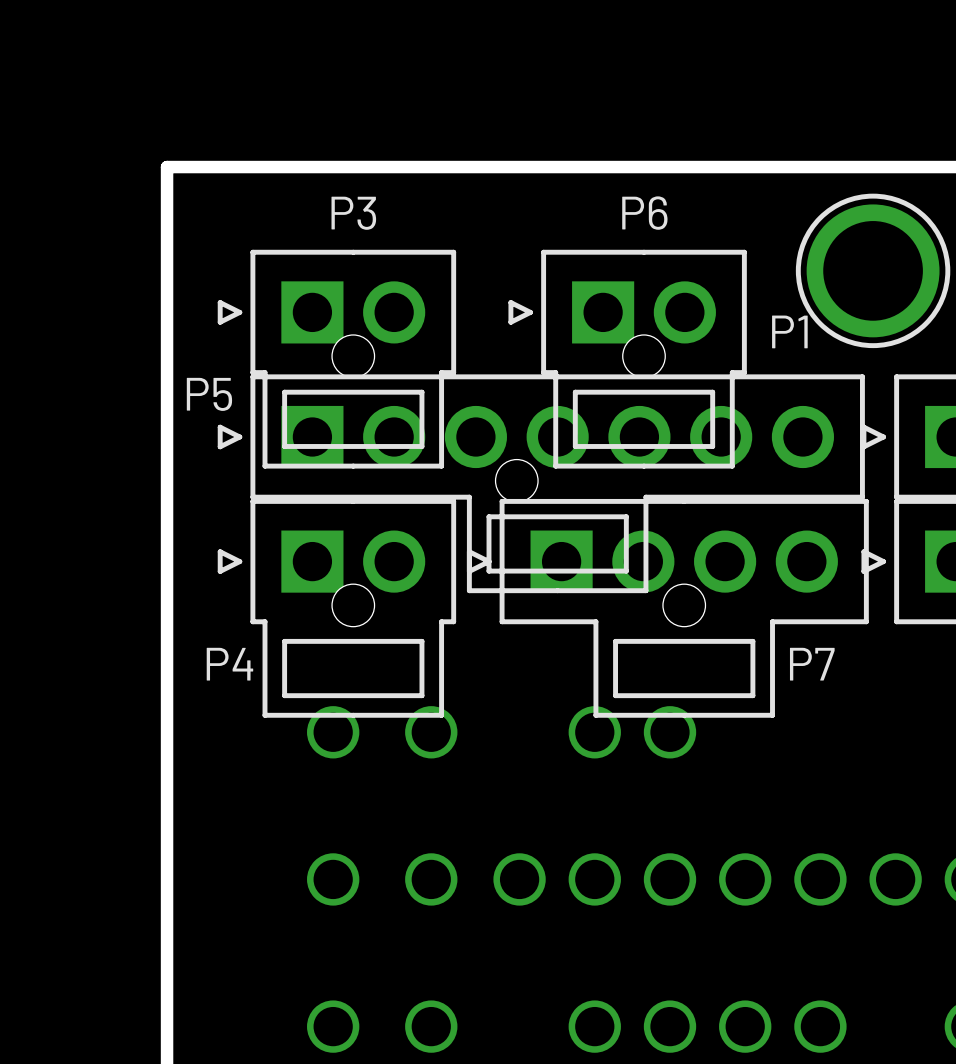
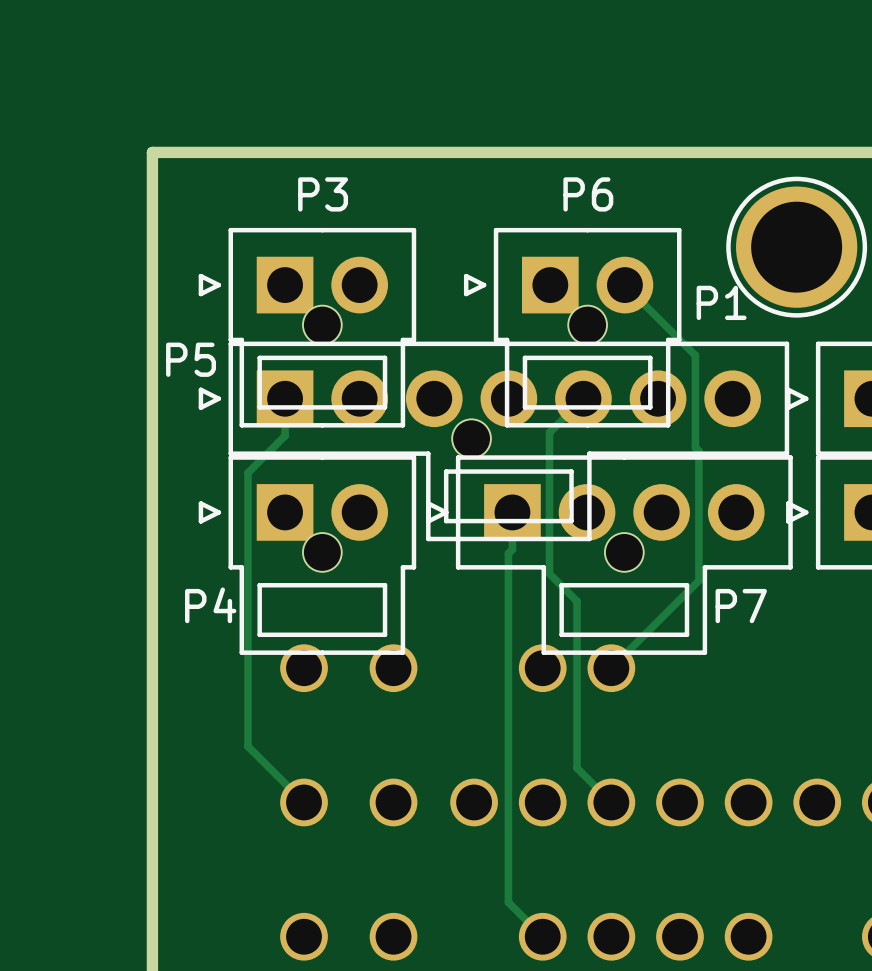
track: none -> (624, 285) (695, 355) (695, 447) (698, 451) (698, 580) (611, 668)
track: none -> (285, 398) (285, 435) (247, 472) (247, 746) (304, 802)
track: none -> (583, 398) (549, 432) (549, 573) (577, 601) (577, 768) (611, 802)
track: none -> (512, 512) (512, 549) (508, 553) (508, 902) (542, 936)

